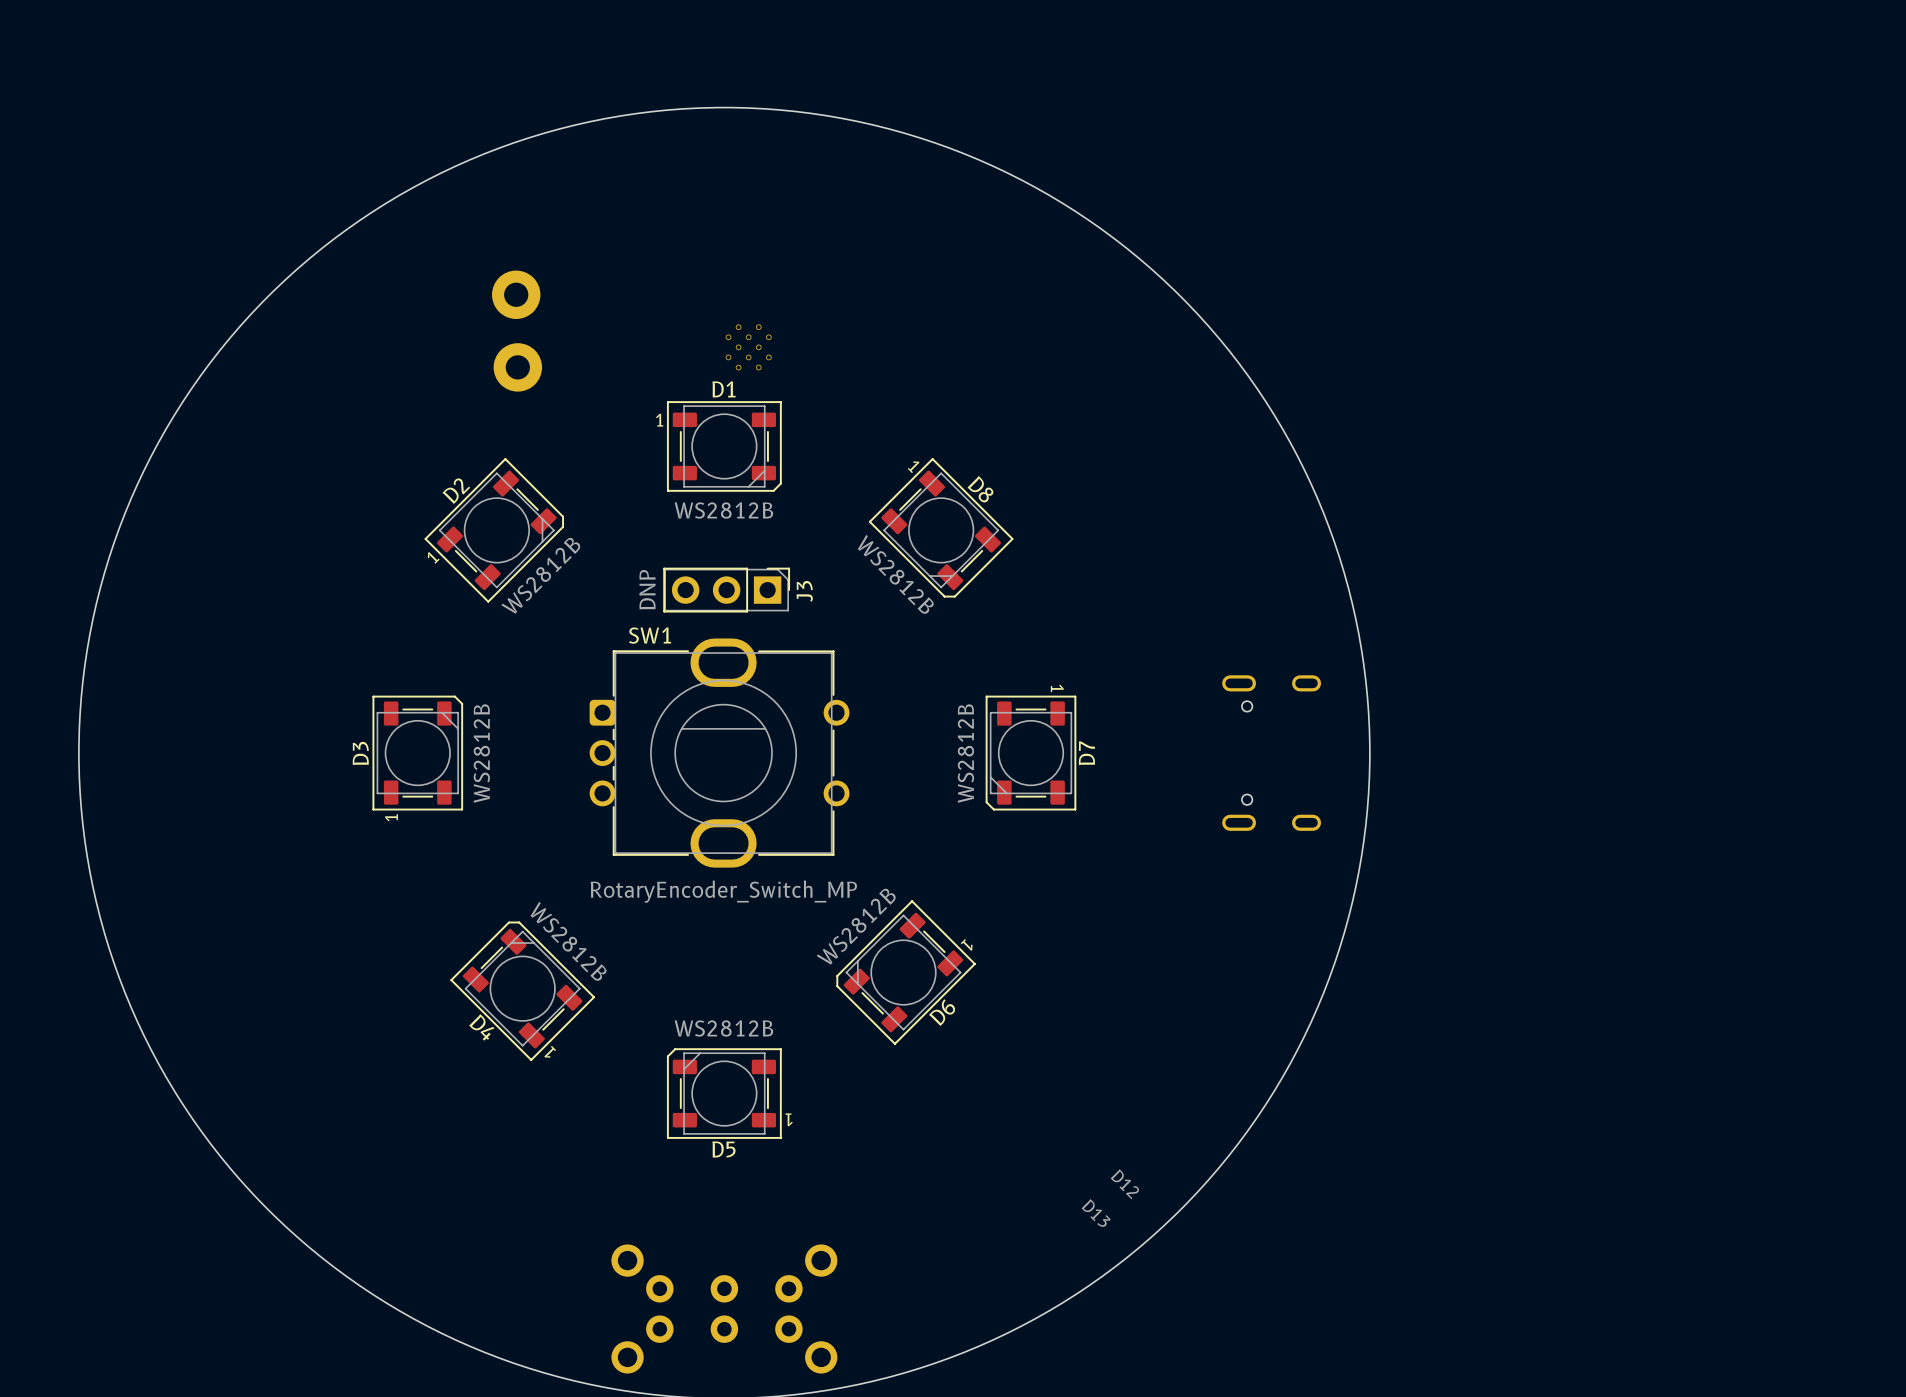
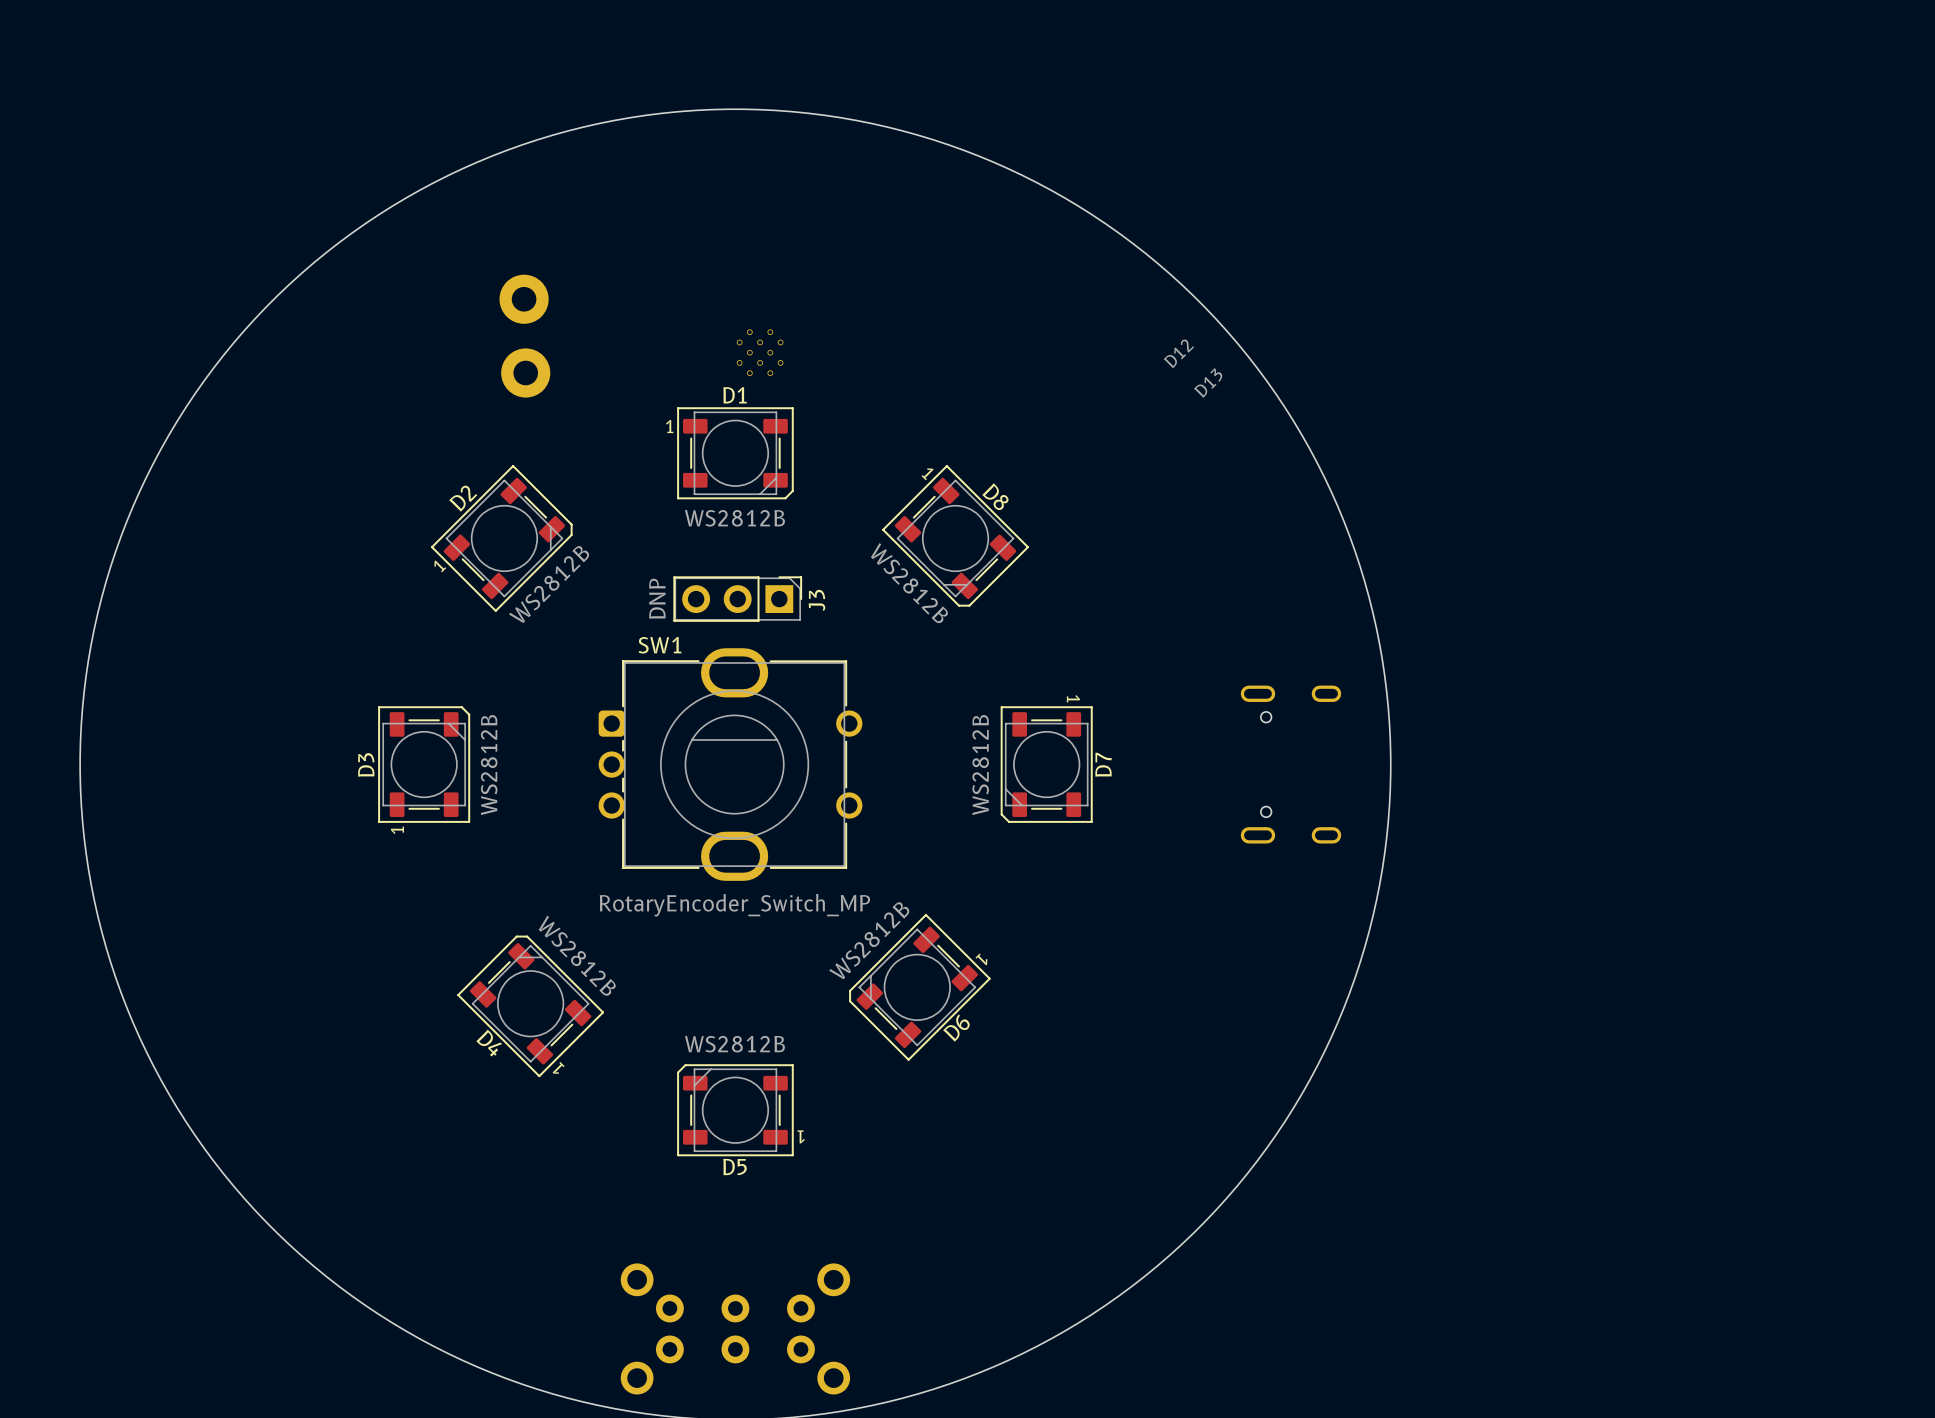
D12 position: (1124, 1184) -> (1178, 353)
D12 name rotation: 0° (1124, 1184) -> 90° counterclockwise (1178, 353)
D13 position: (1096, 1213) -> (1208, 382)
D13 name rotation: 0° (1096, 1213) -> 90° counterclockwise (1208, 382)

